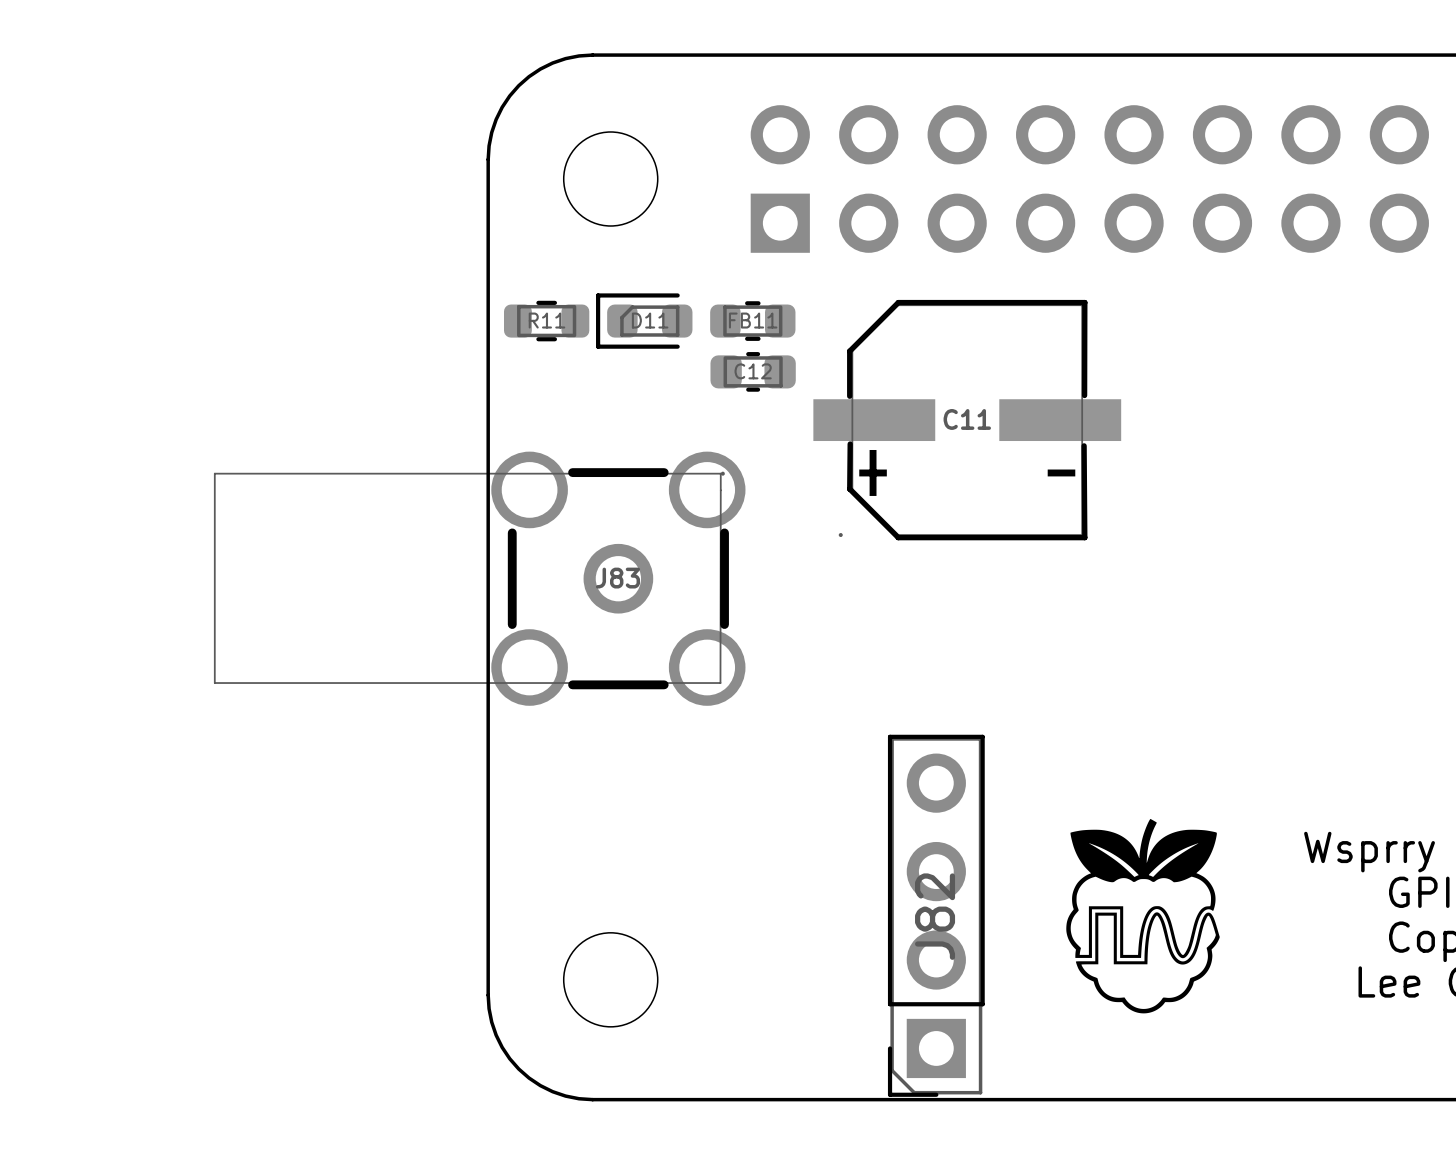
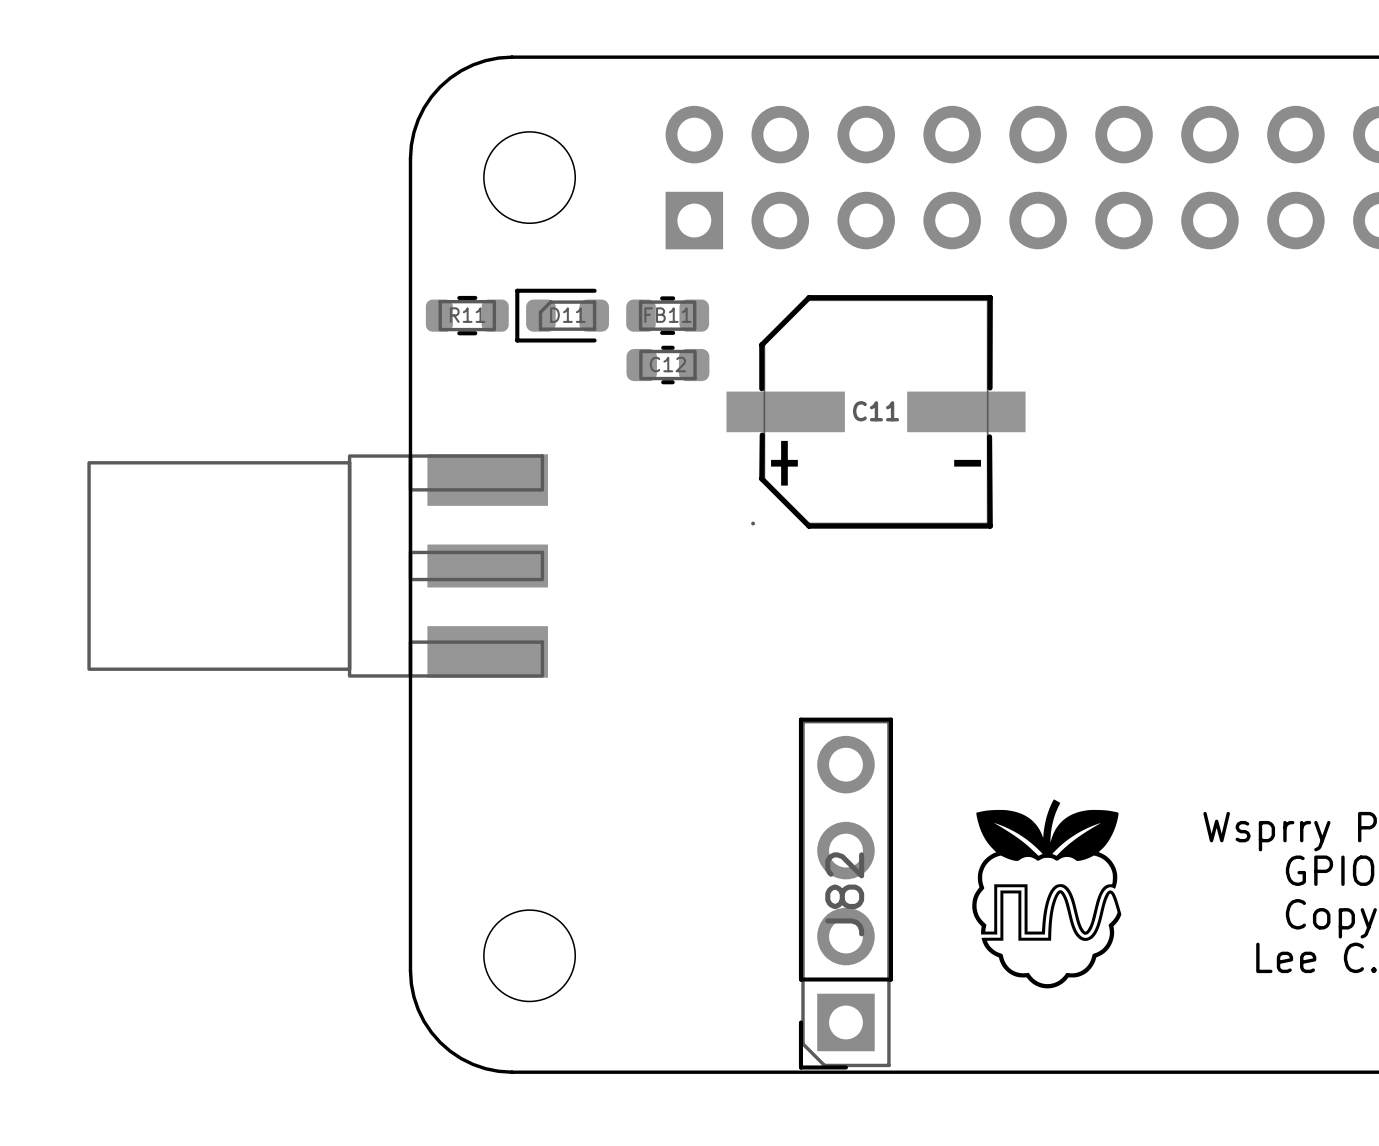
part: none -> (317, 566)
J83: (479, 578) -> none

